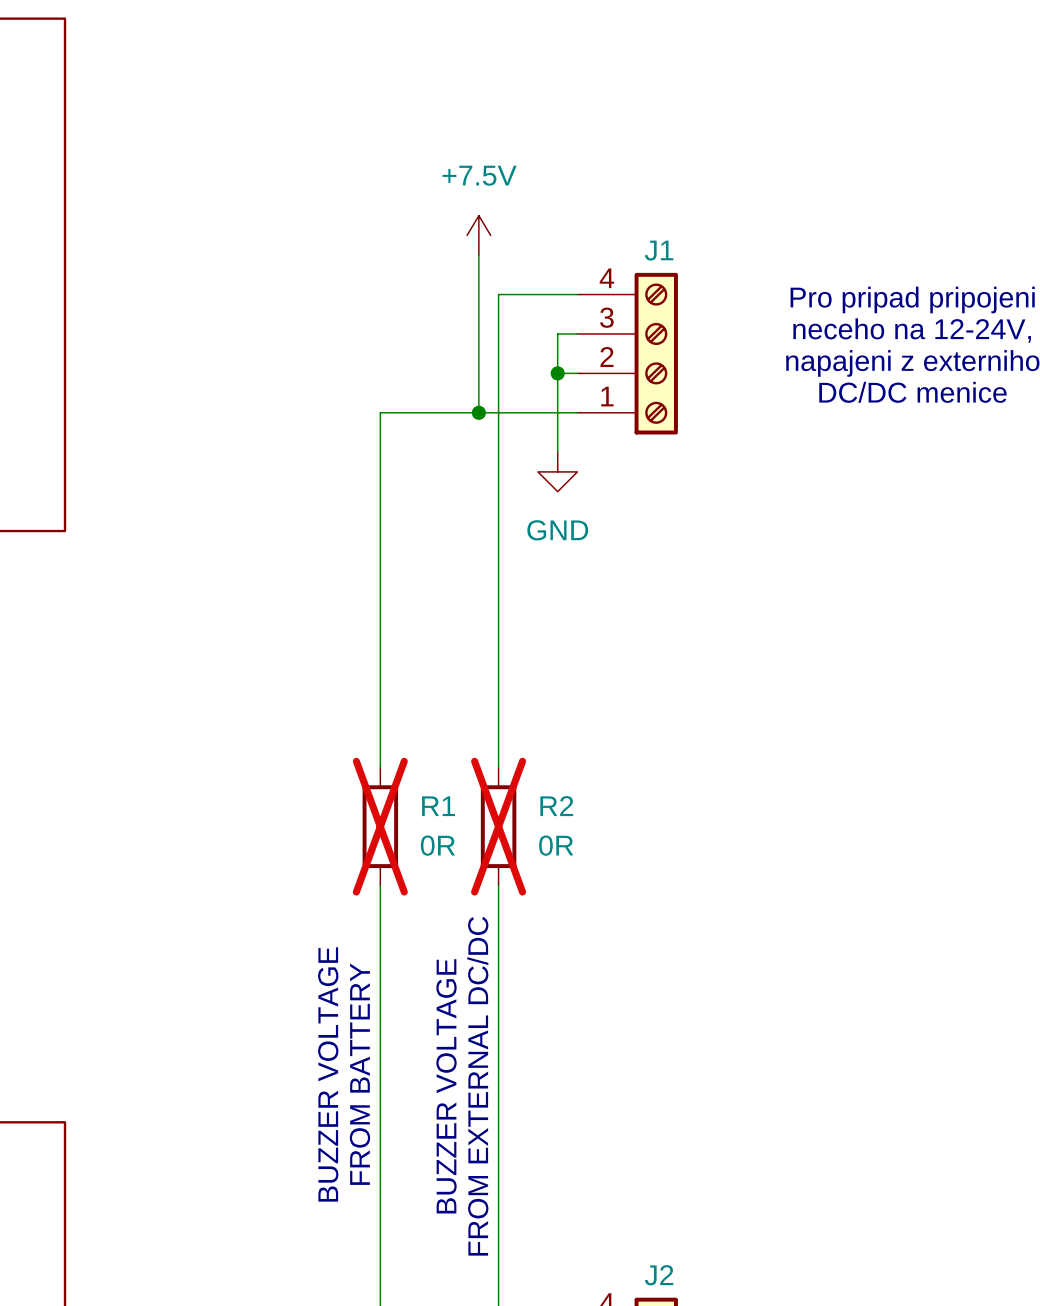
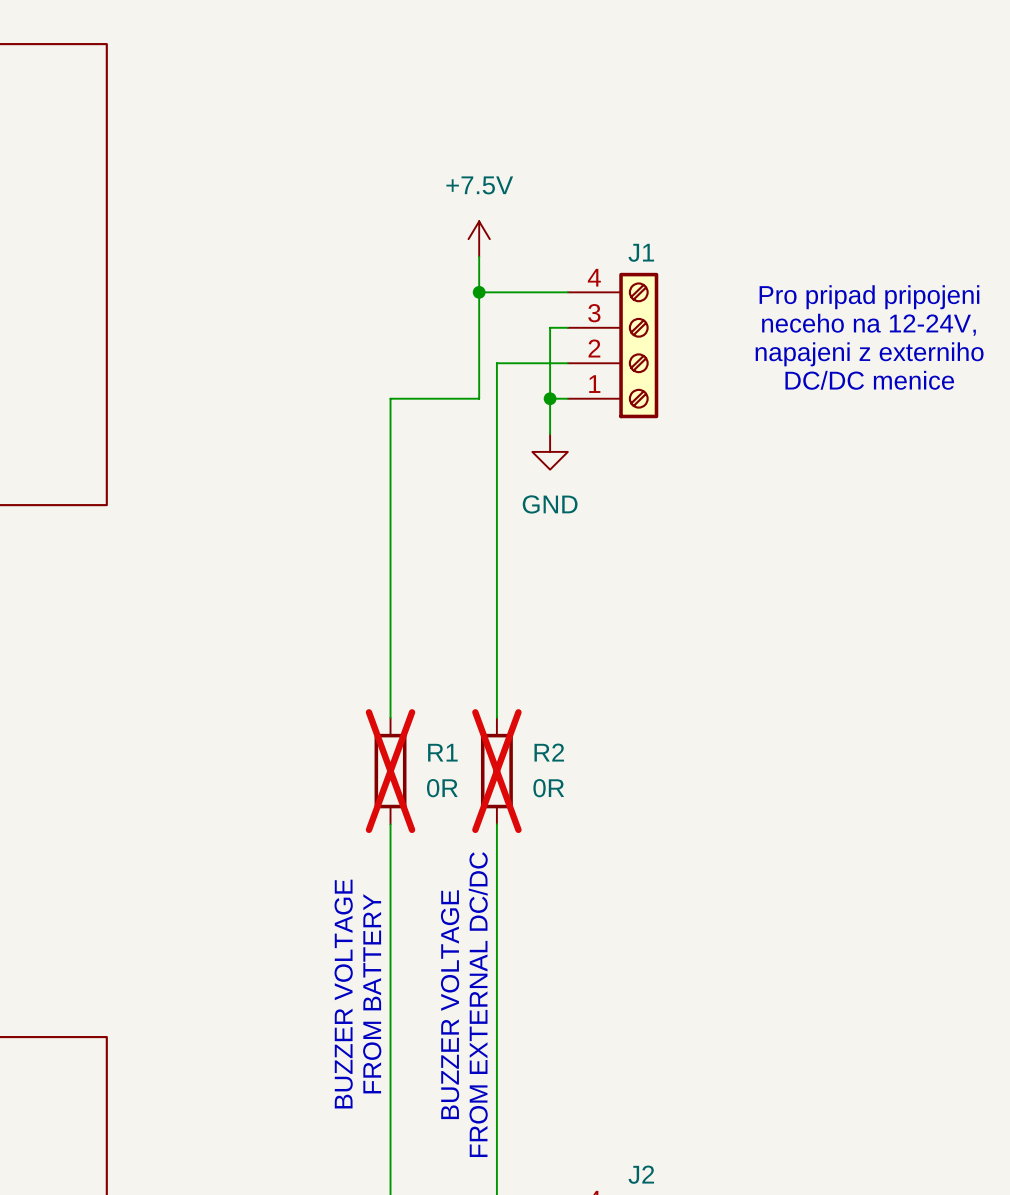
junction: none -> (479, 292)
wire: (498, 294) (498, 373) -> (496, 292) (479, 292)
wire: none -> (496, 363) (550, 363)
junction: (557, 373) -> none
wire: (478, 412) (557, 412) -> none
junction: (478, 412) -> none
junction: none -> (550, 398)

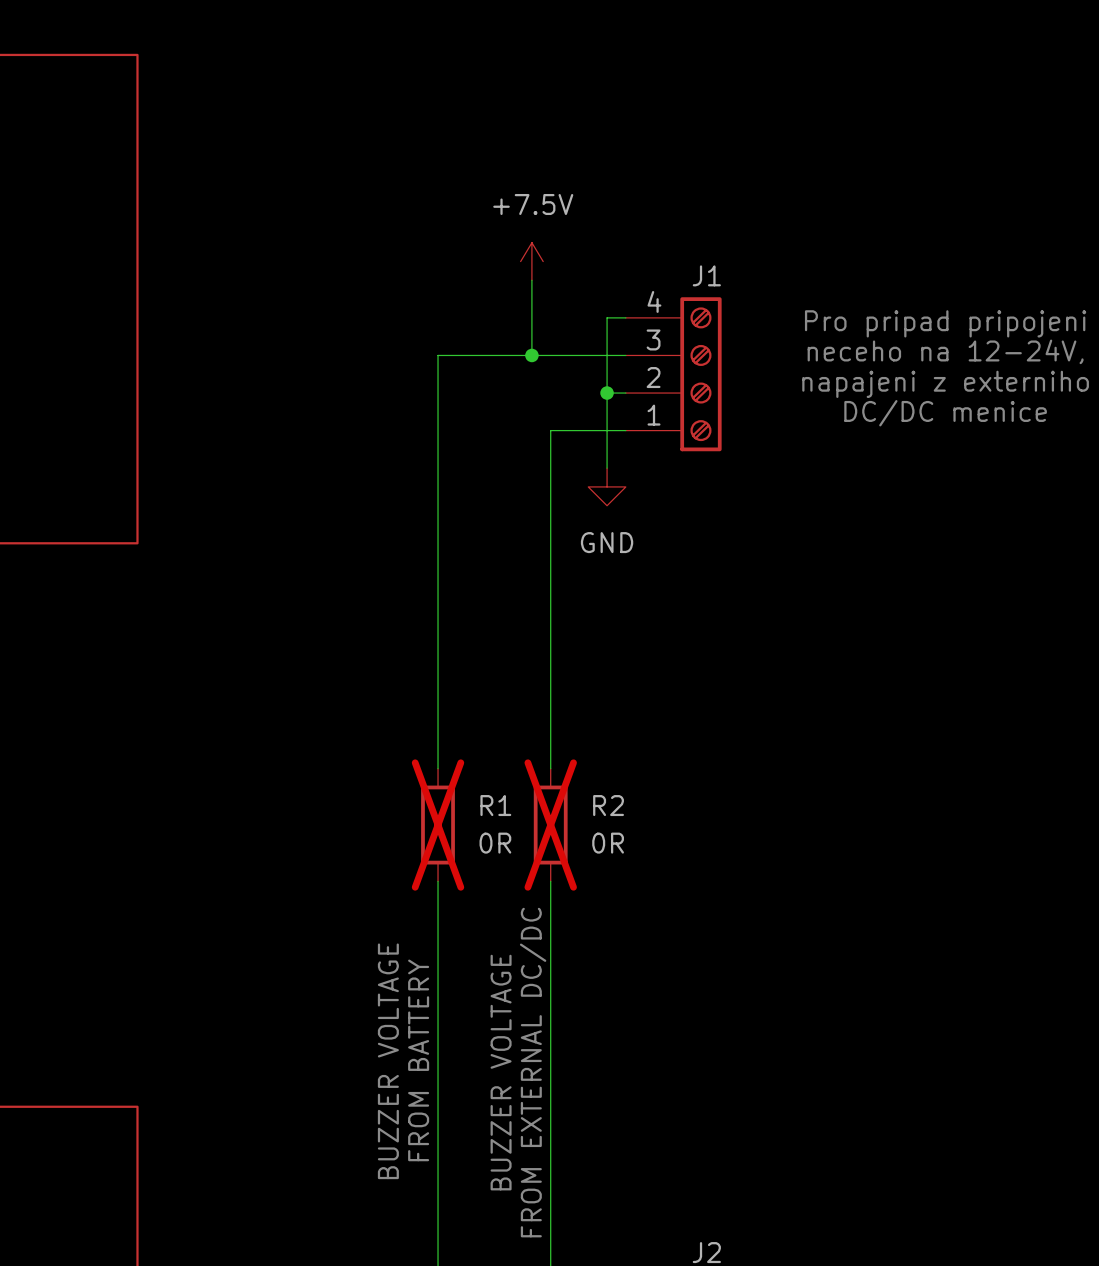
wire: (479, 292) (550, 292) -> none
junction position: (479, 292) -> (531, 355)
wire: (479, 327) (479, 398) (390, 398) -> (607, 317) (607, 355) (438, 355) (438, 430)
wire: (550, 363) (496, 363) (496, 398) -> (607, 430) (550, 430)
junction position: (550, 398) -> (607, 393)

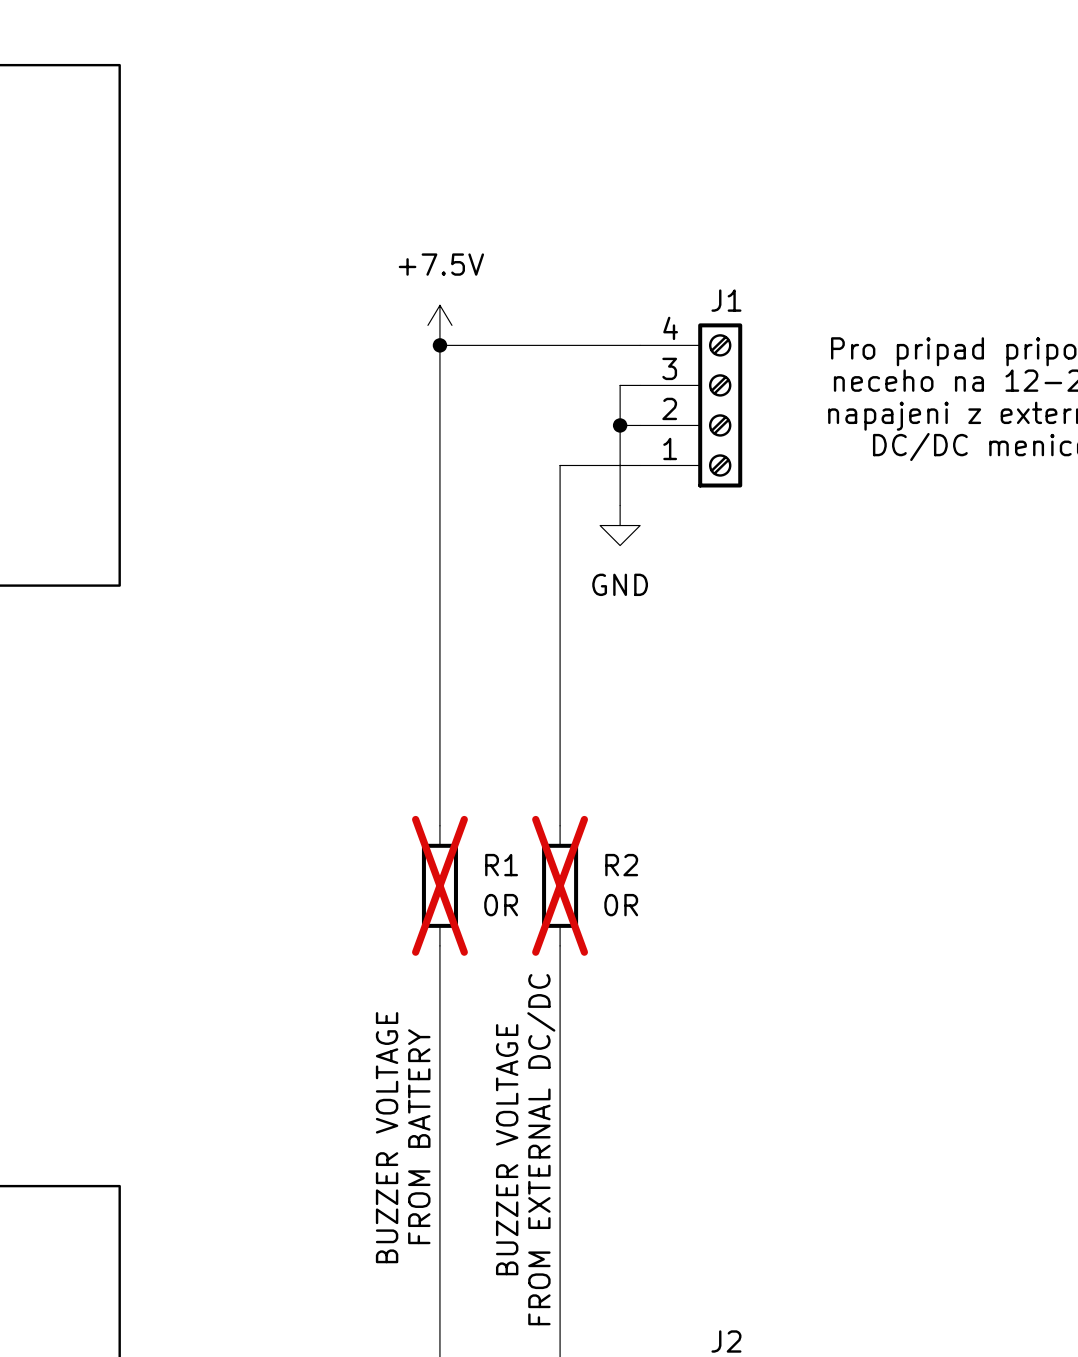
power symbol position: +7.5V (531, 261) -> +7.5V (439, 325)
wire: (531, 280) (531, 355) -> none
junction: none -> (439, 345)
wire: (607, 317) (607, 355) (438, 355) -> (620, 345) (439, 345) (439, 385)
junction: (531, 355) -> none

